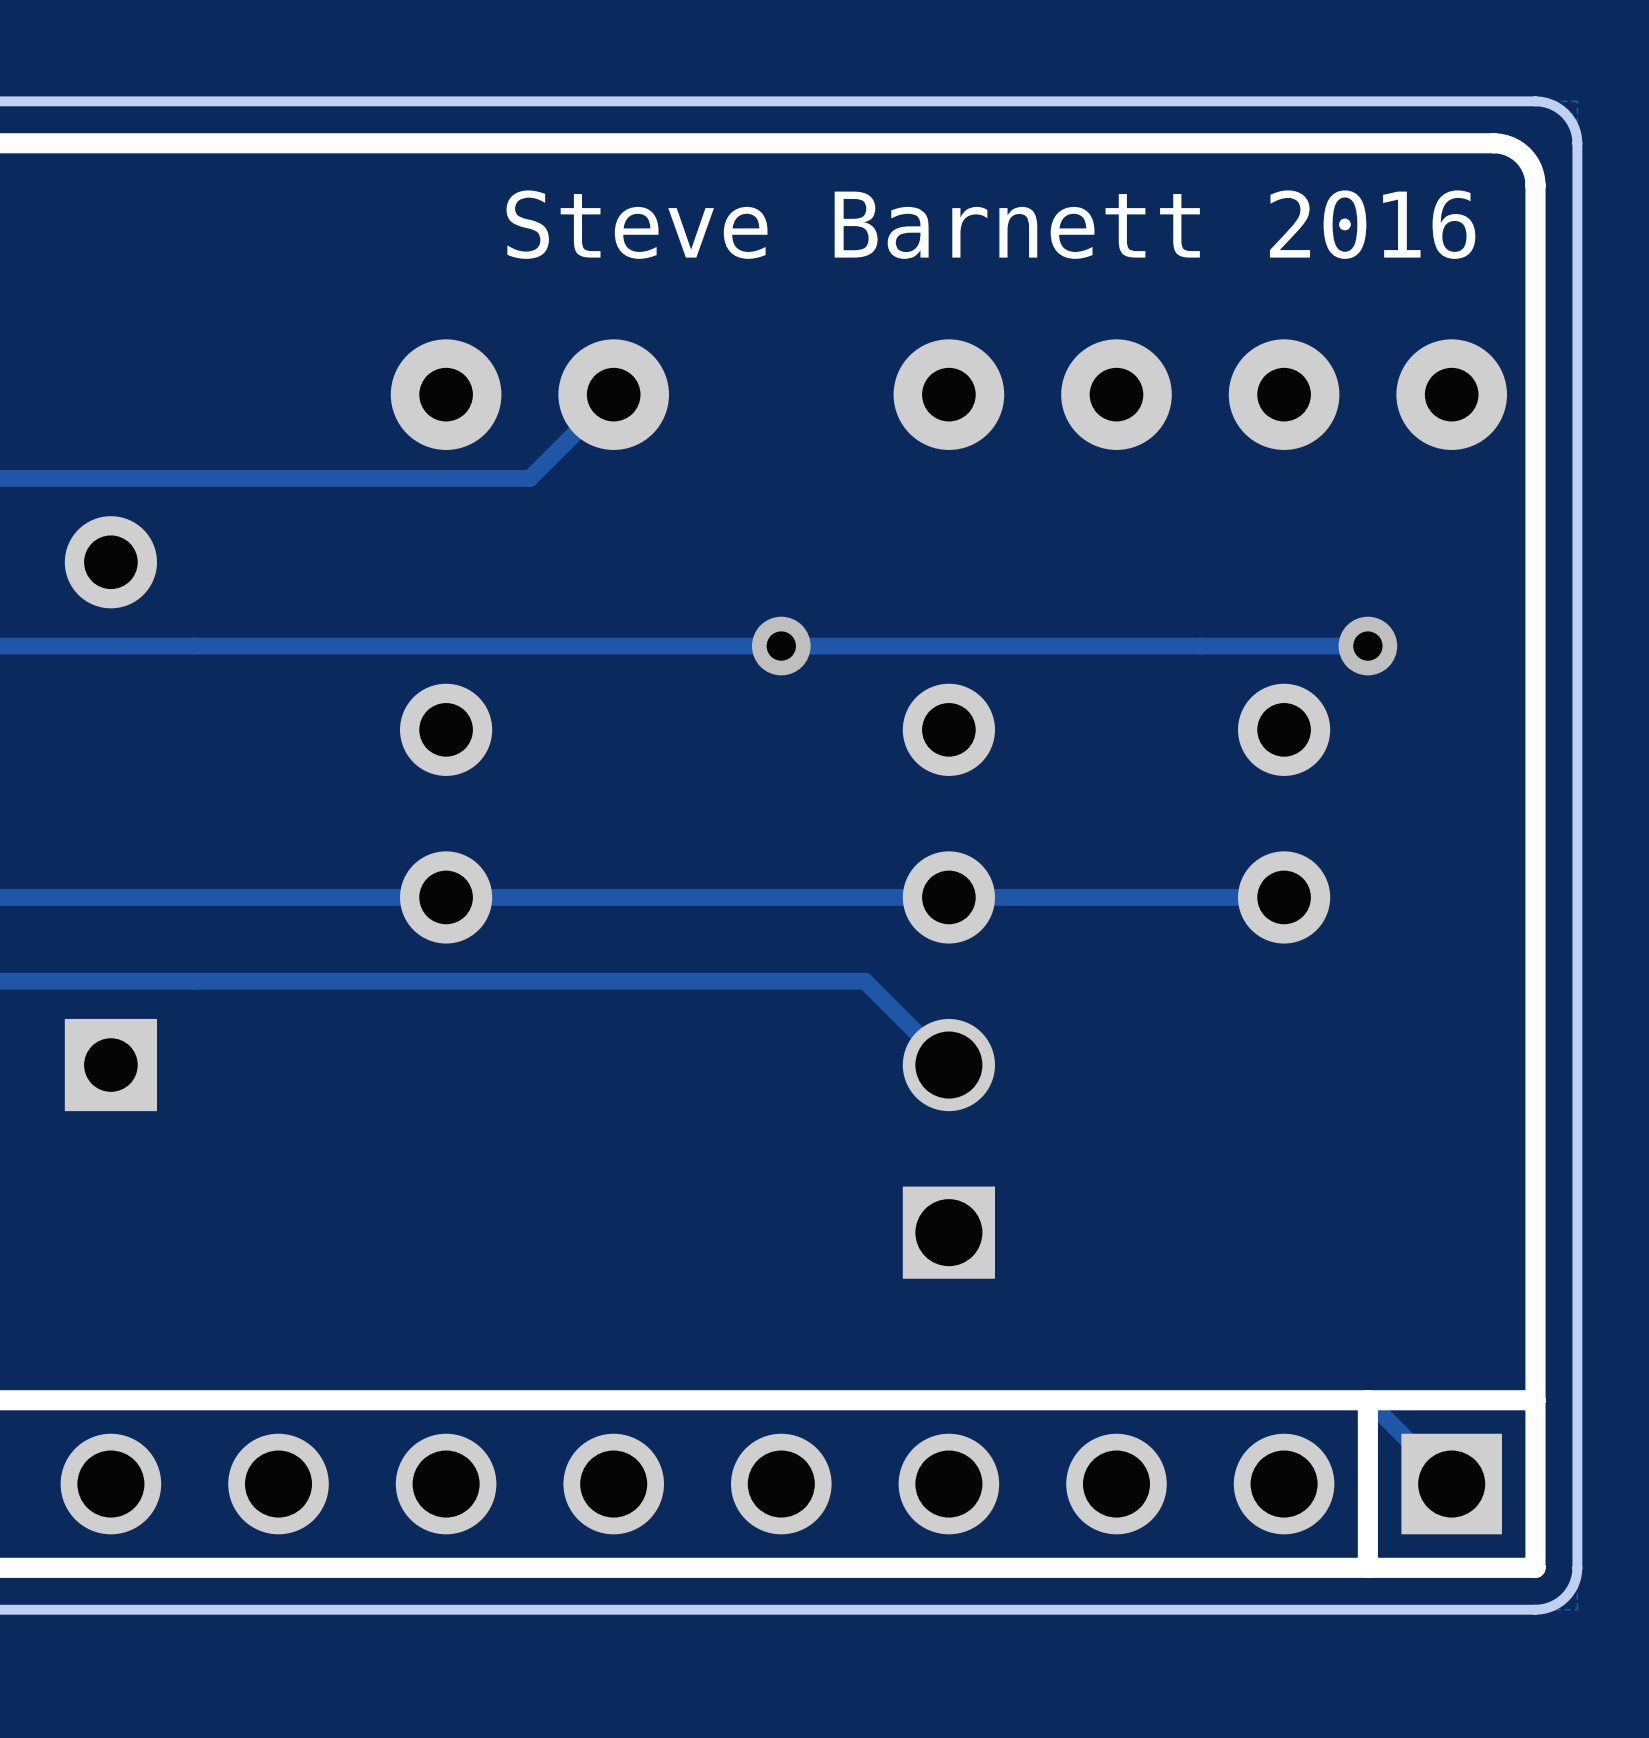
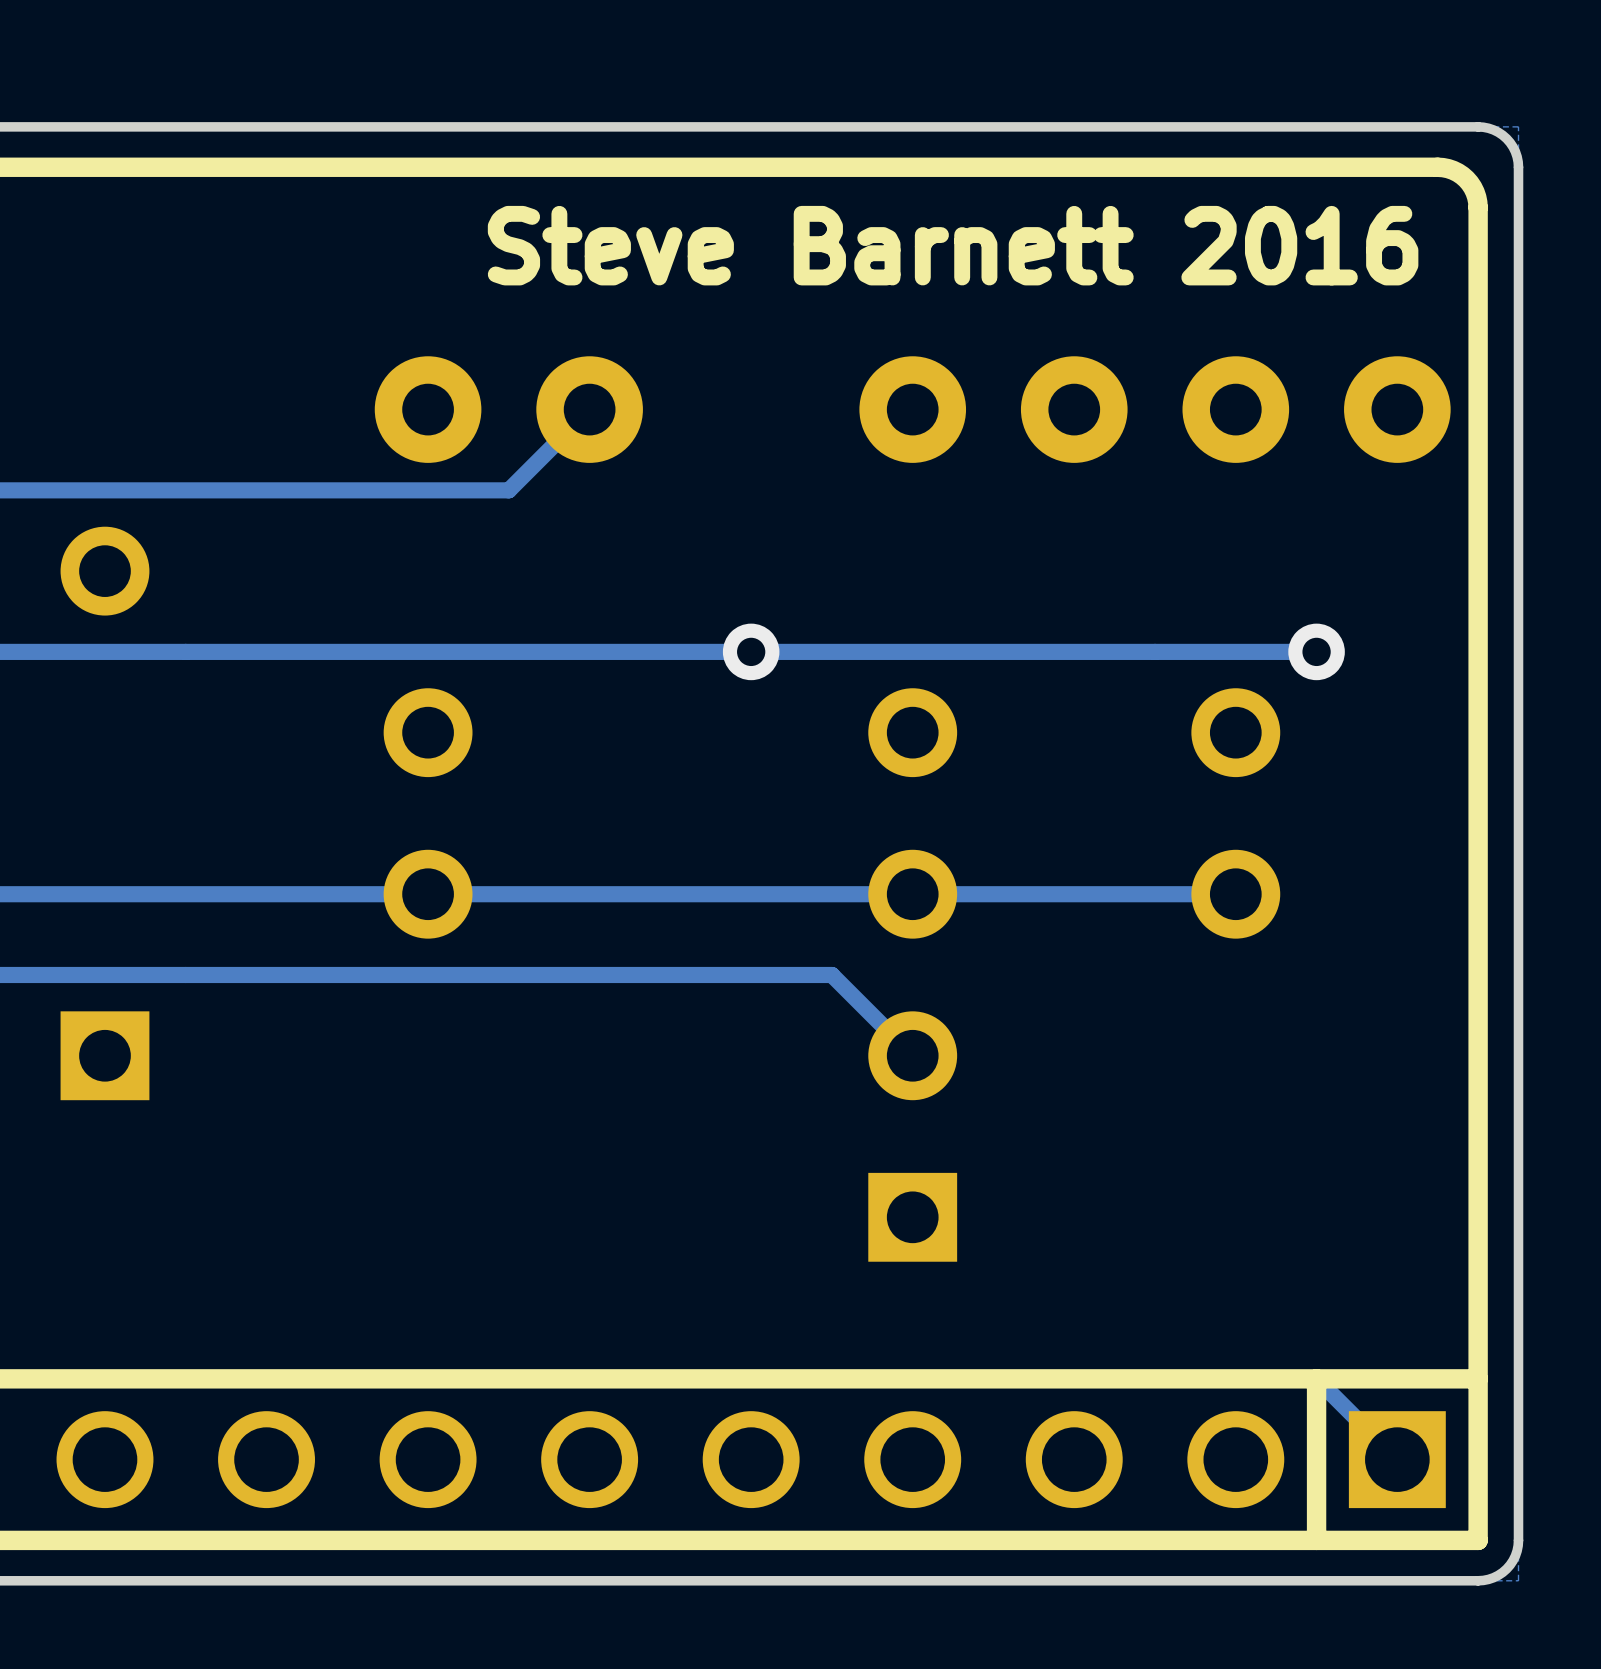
part footprint: [902, 1018, 995, 1279] -> [868, 1011, 958, 1262]

